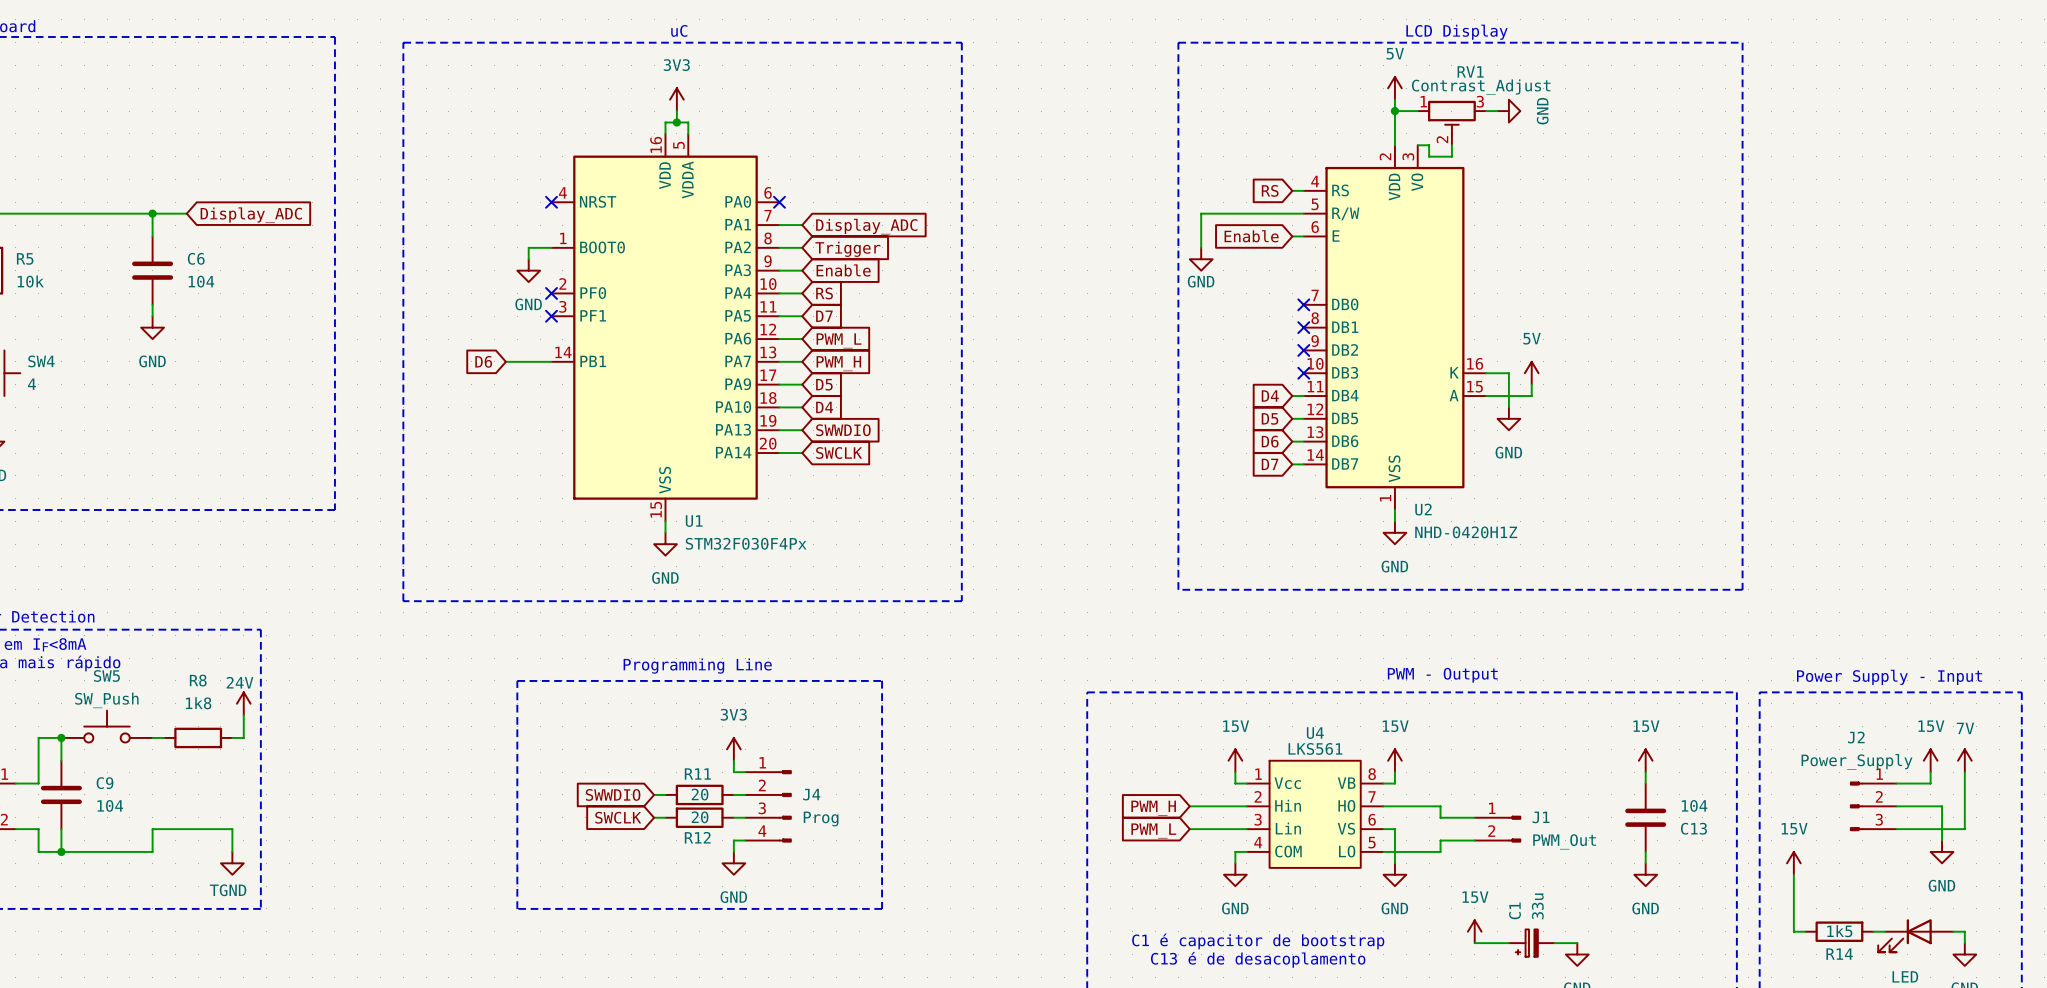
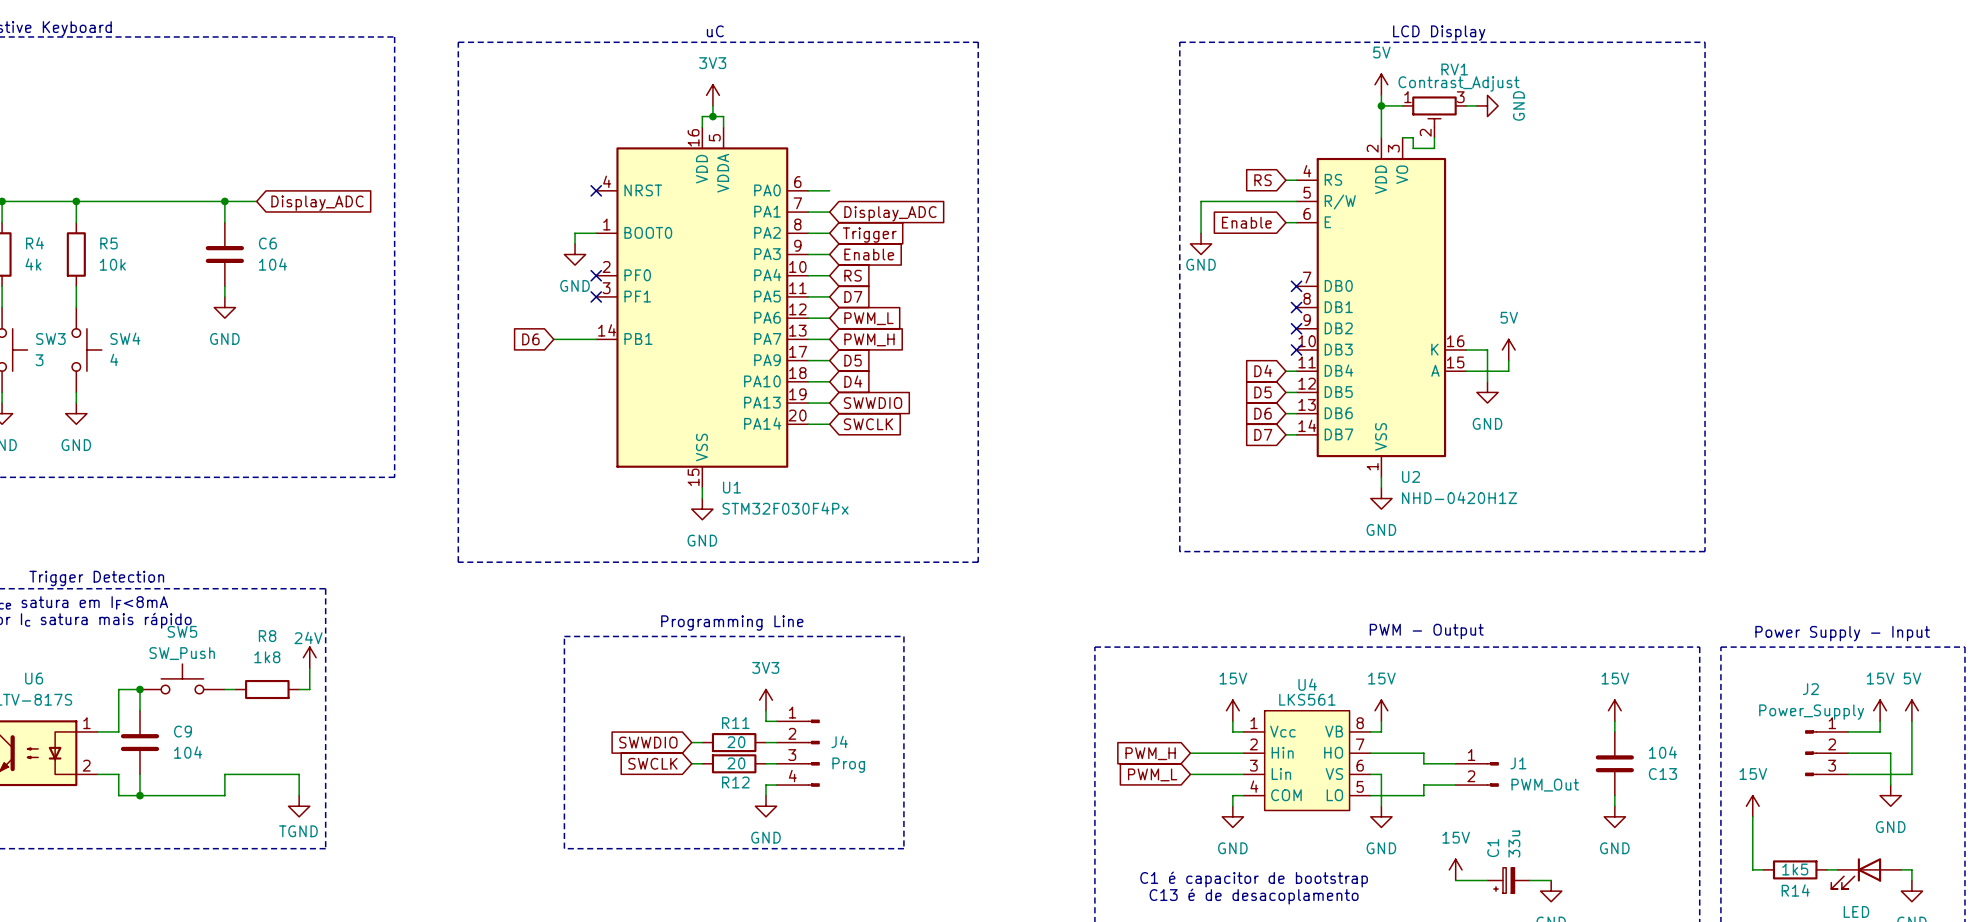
wire: none -> (808, 190) (829, 190)
no-connect mark: (779, 202) -> none
power symbol: 7V (1964, 760) -> 5V (1911, 710)

